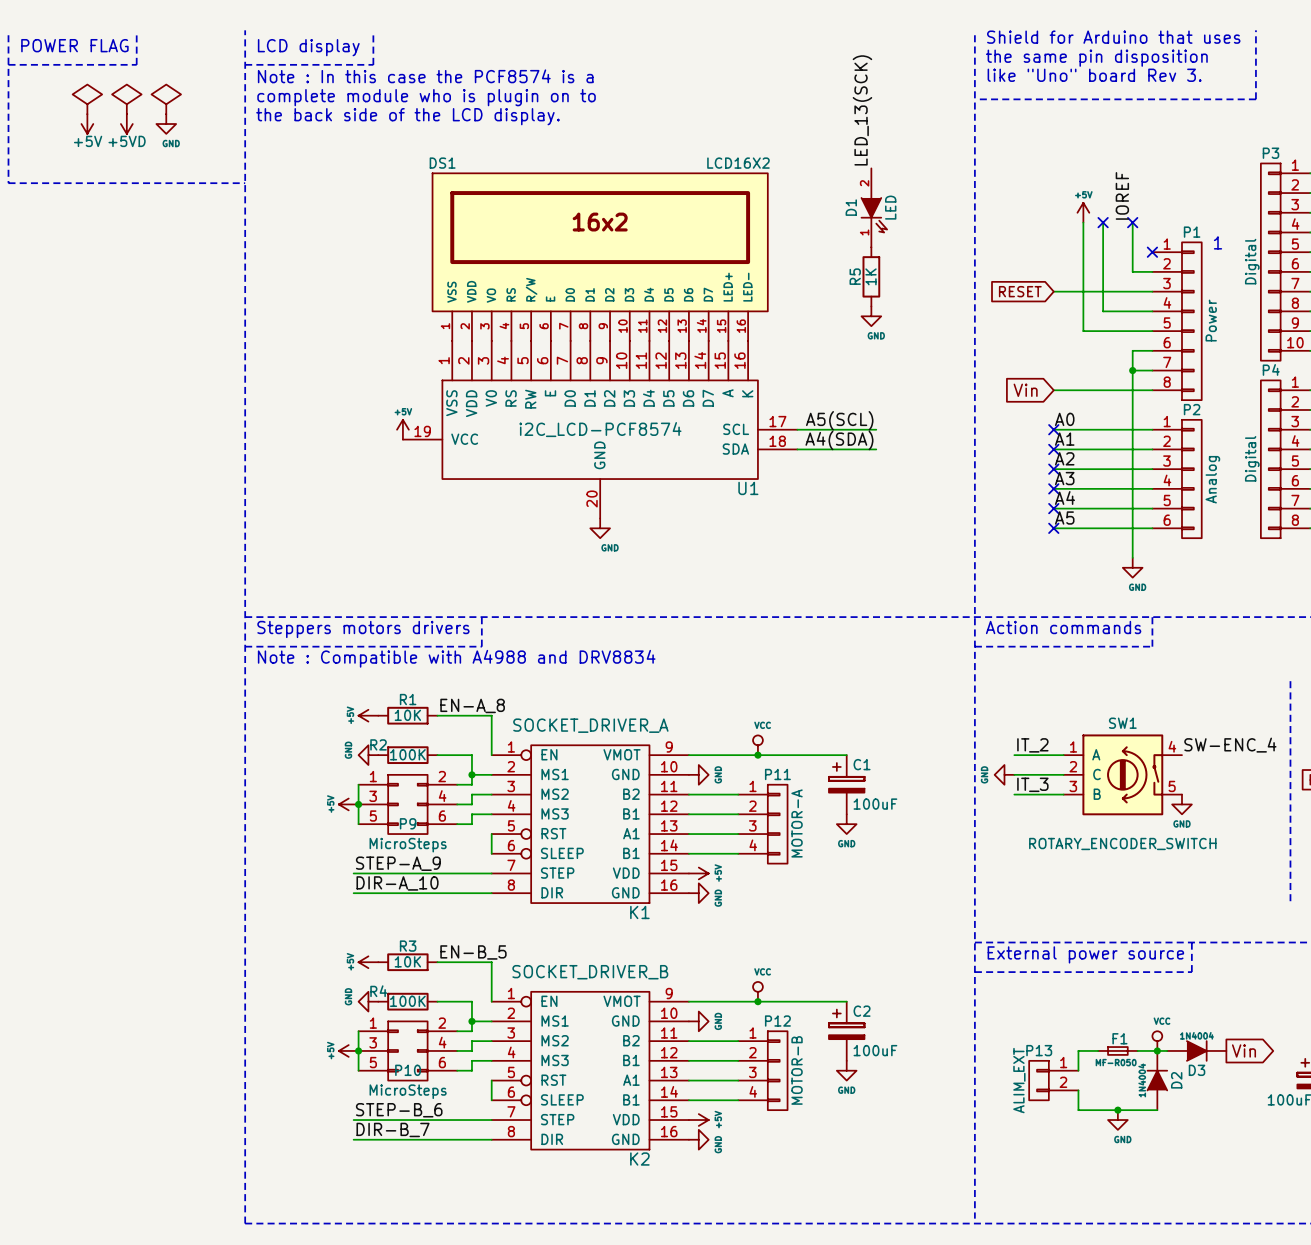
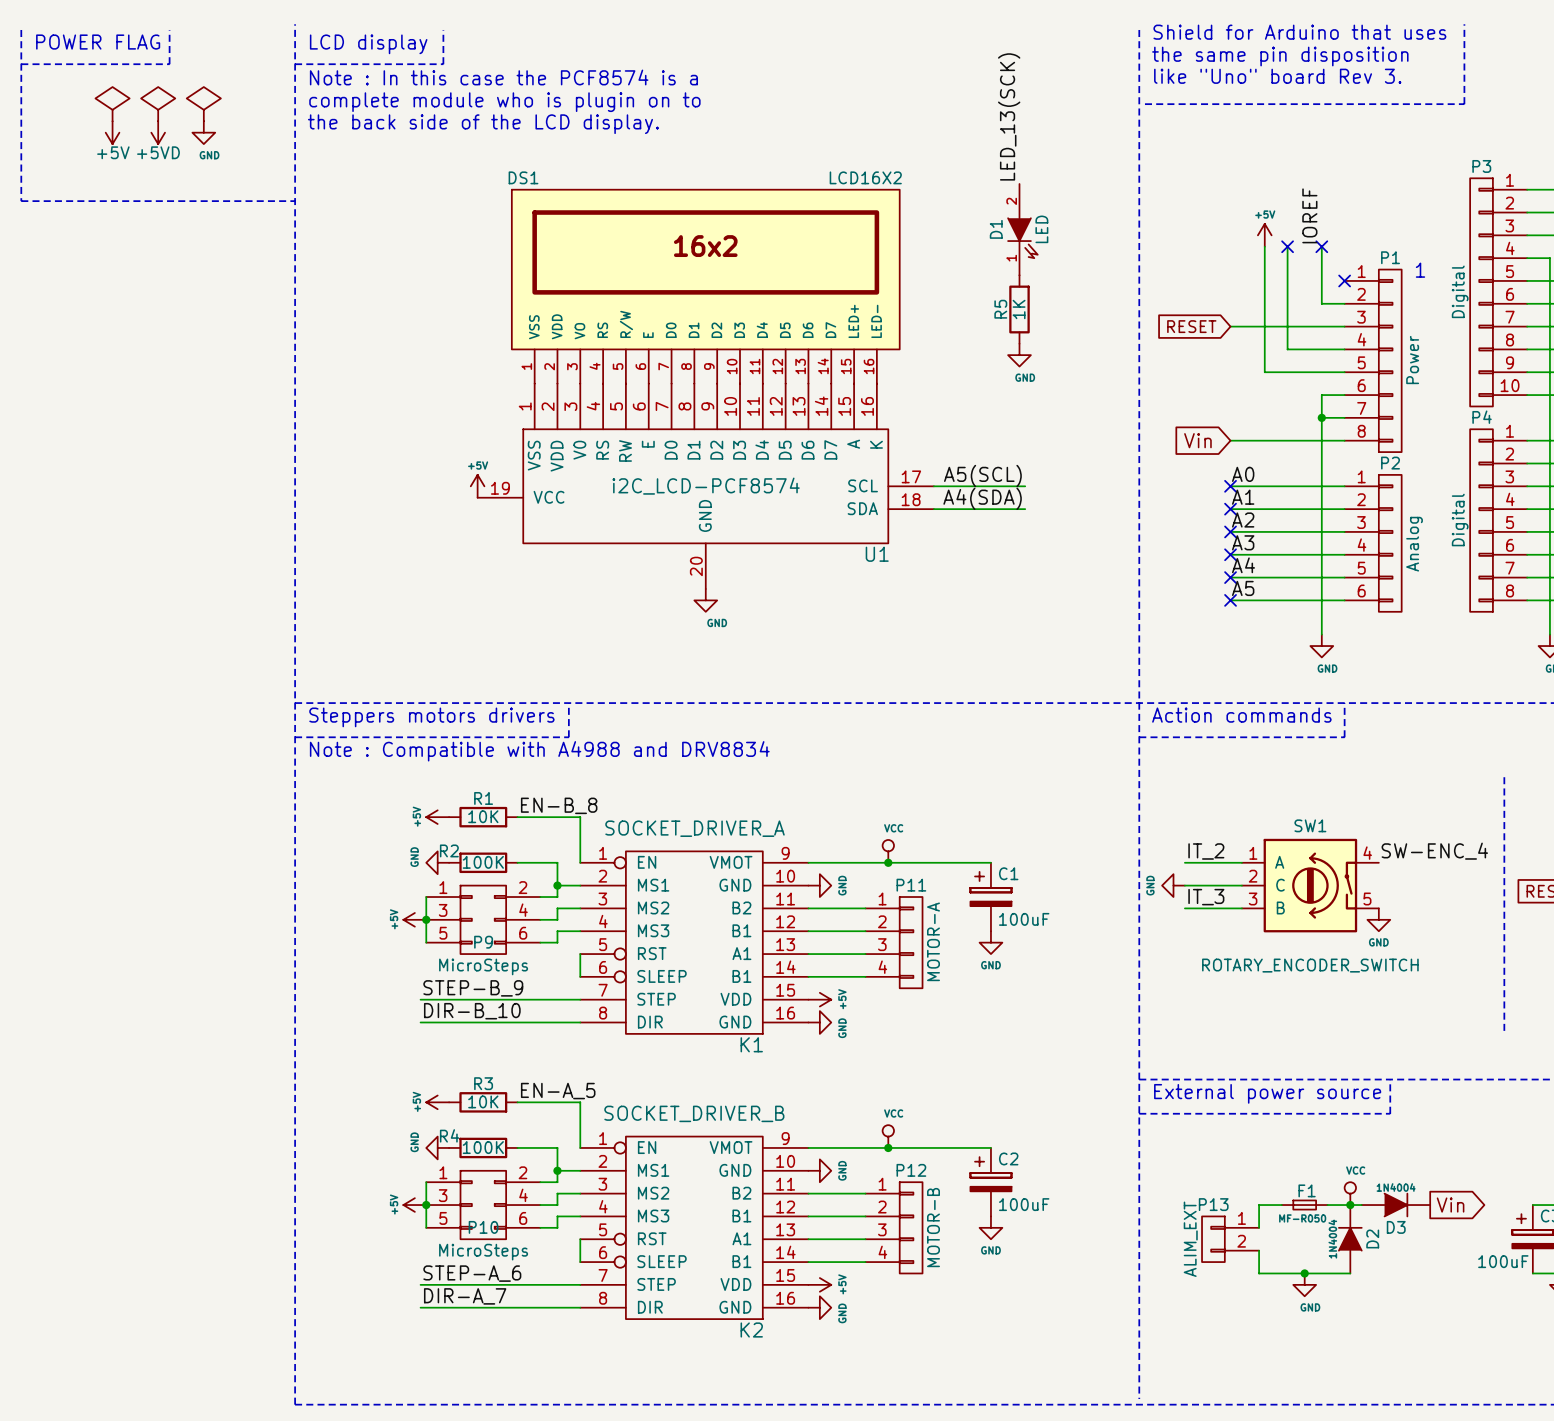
label: EN-A_8 (472, 705) -> EN-B_8 (559, 805)
label: STEP-A_9 (398, 863) -> STEP-B_9 (473, 988)
label: DIR-A_10 (397, 883) -> DIR-B_10 (472, 1011)
label: EN-B_5 (473, 952) -> EN-A_5 (558, 1091)
label: STEP-B_6 (399, 1110) -> STEP-A_6 (472, 1273)
label: DIR-B_7 (393, 1129) -> DIR-A_7 (465, 1296)

